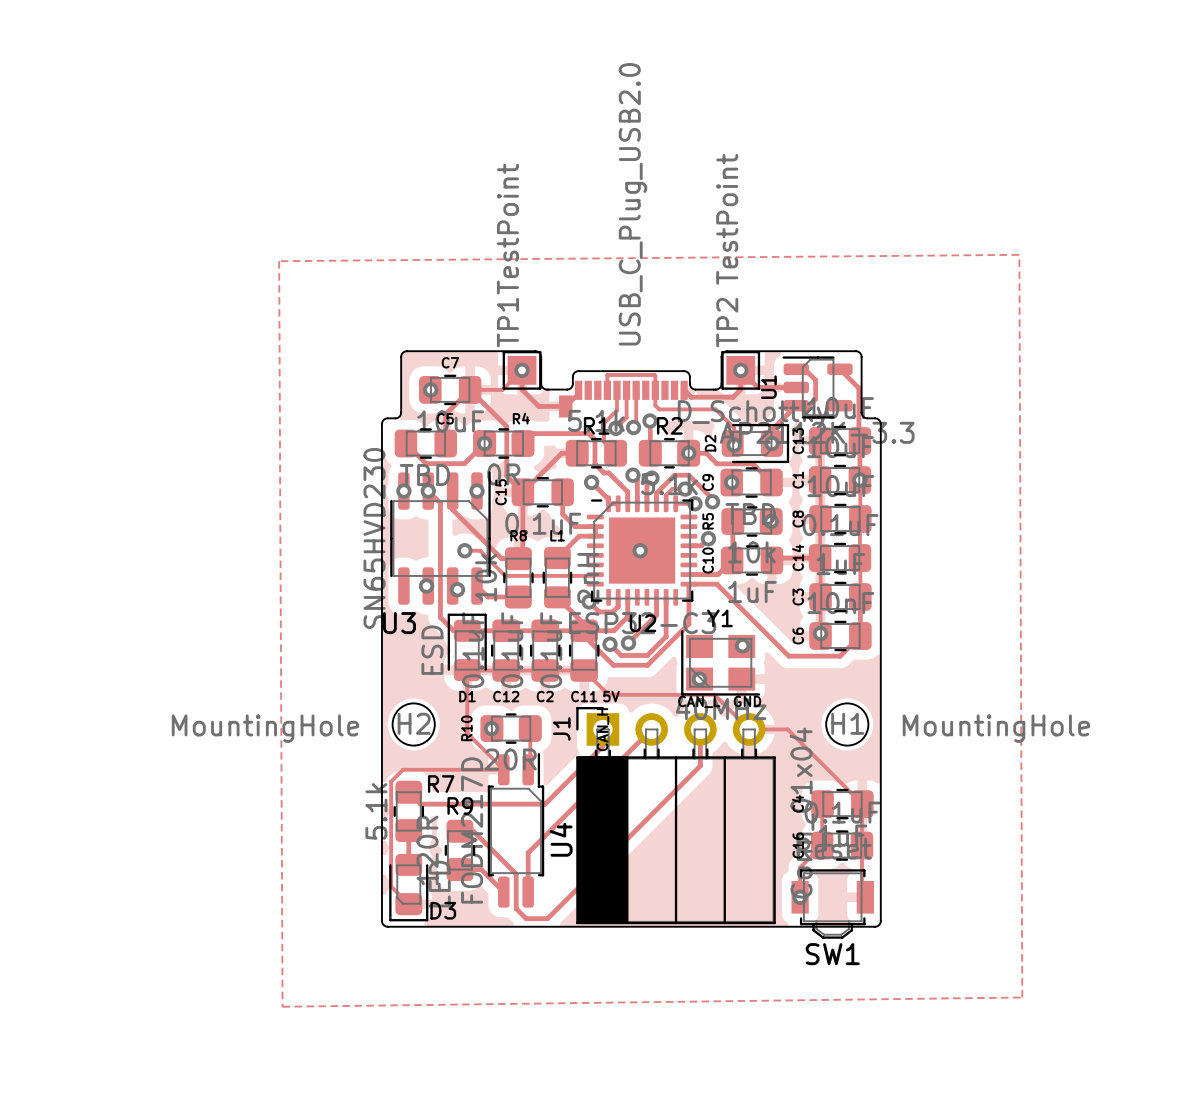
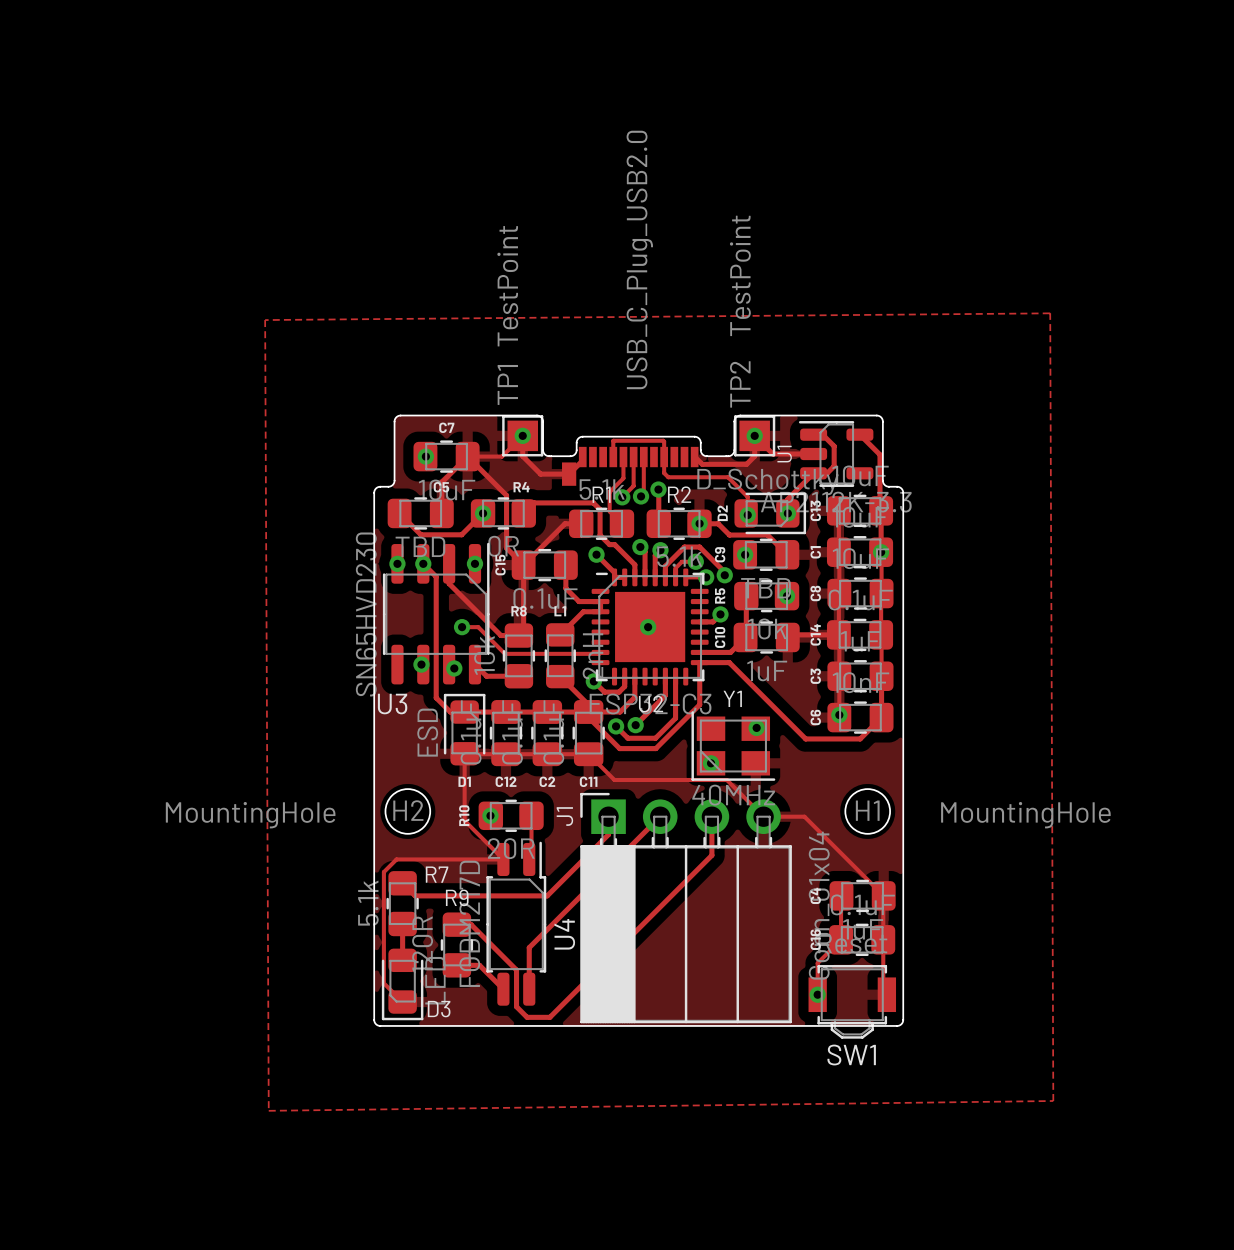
J1 text: 5V (611, 696) -> none
J1 text: CAN_L (699, 701) -> none
J1 text: GND (747, 701) -> none
J1 text: CAN_H (603, 729) -> none

